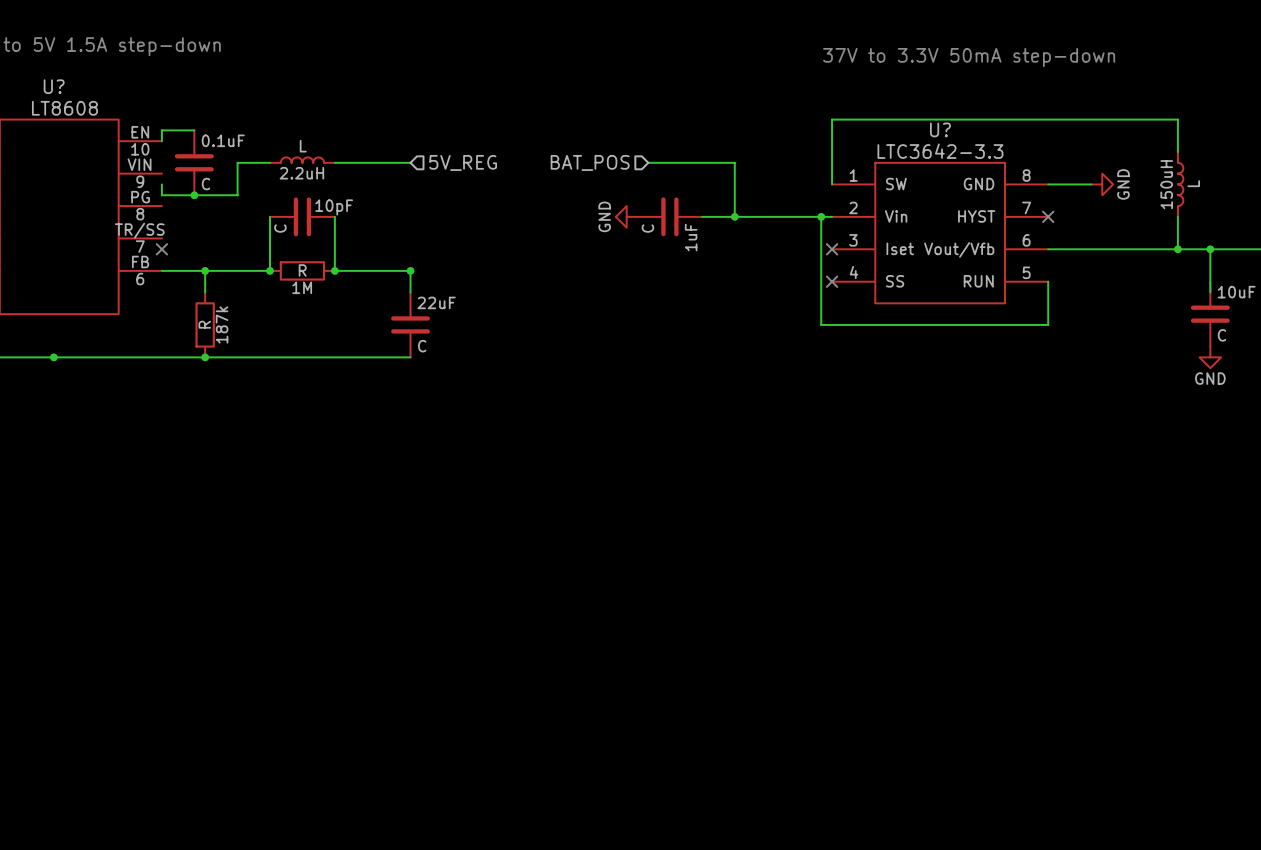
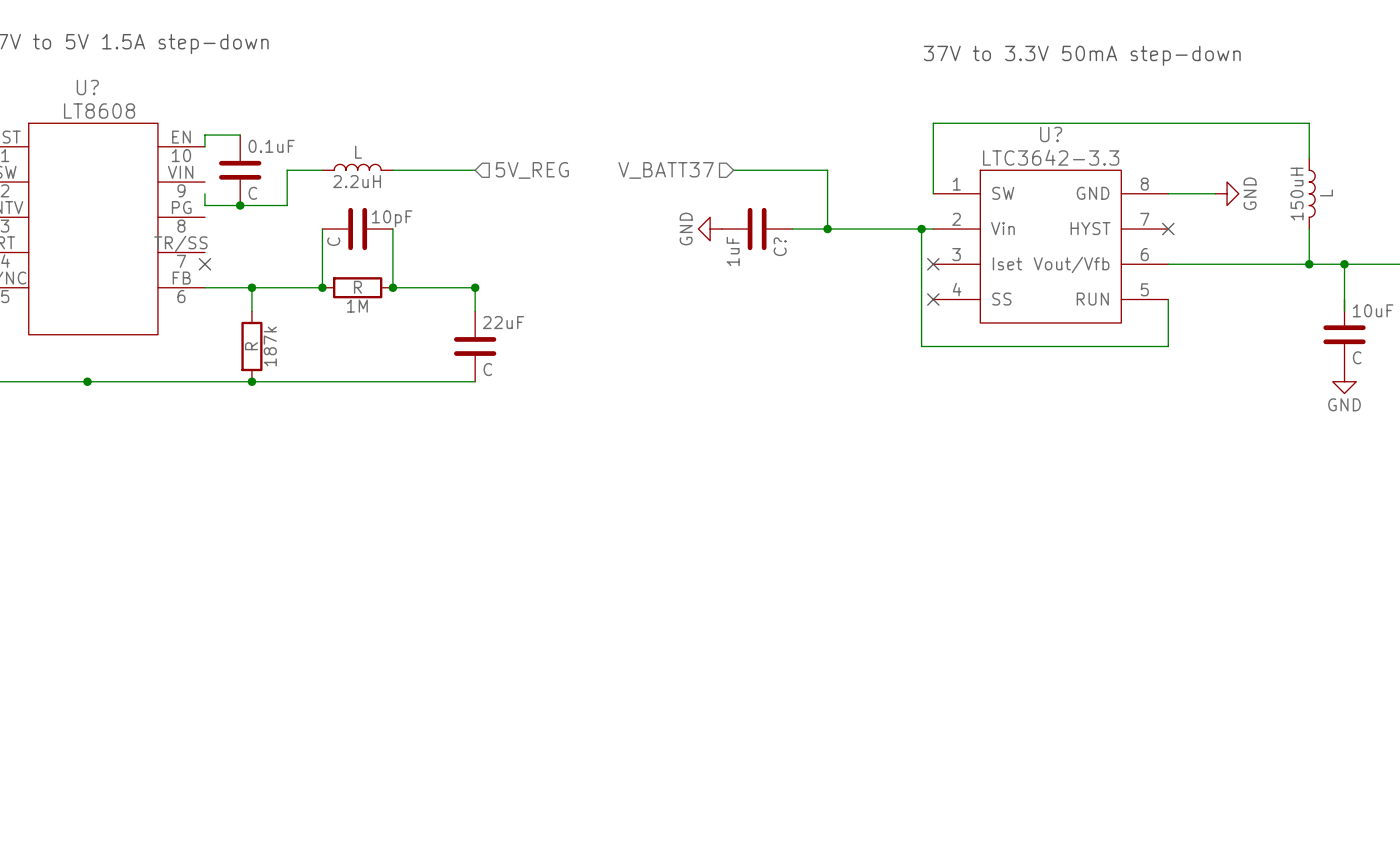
hierarchical label: BAT_POS (590, 162) -> V_BATT37 (666, 170)
1uF value: C (647, 228) -> 1uF (733, 251)
1uF name: 1uF (691, 237) -> C? (780, 246)

